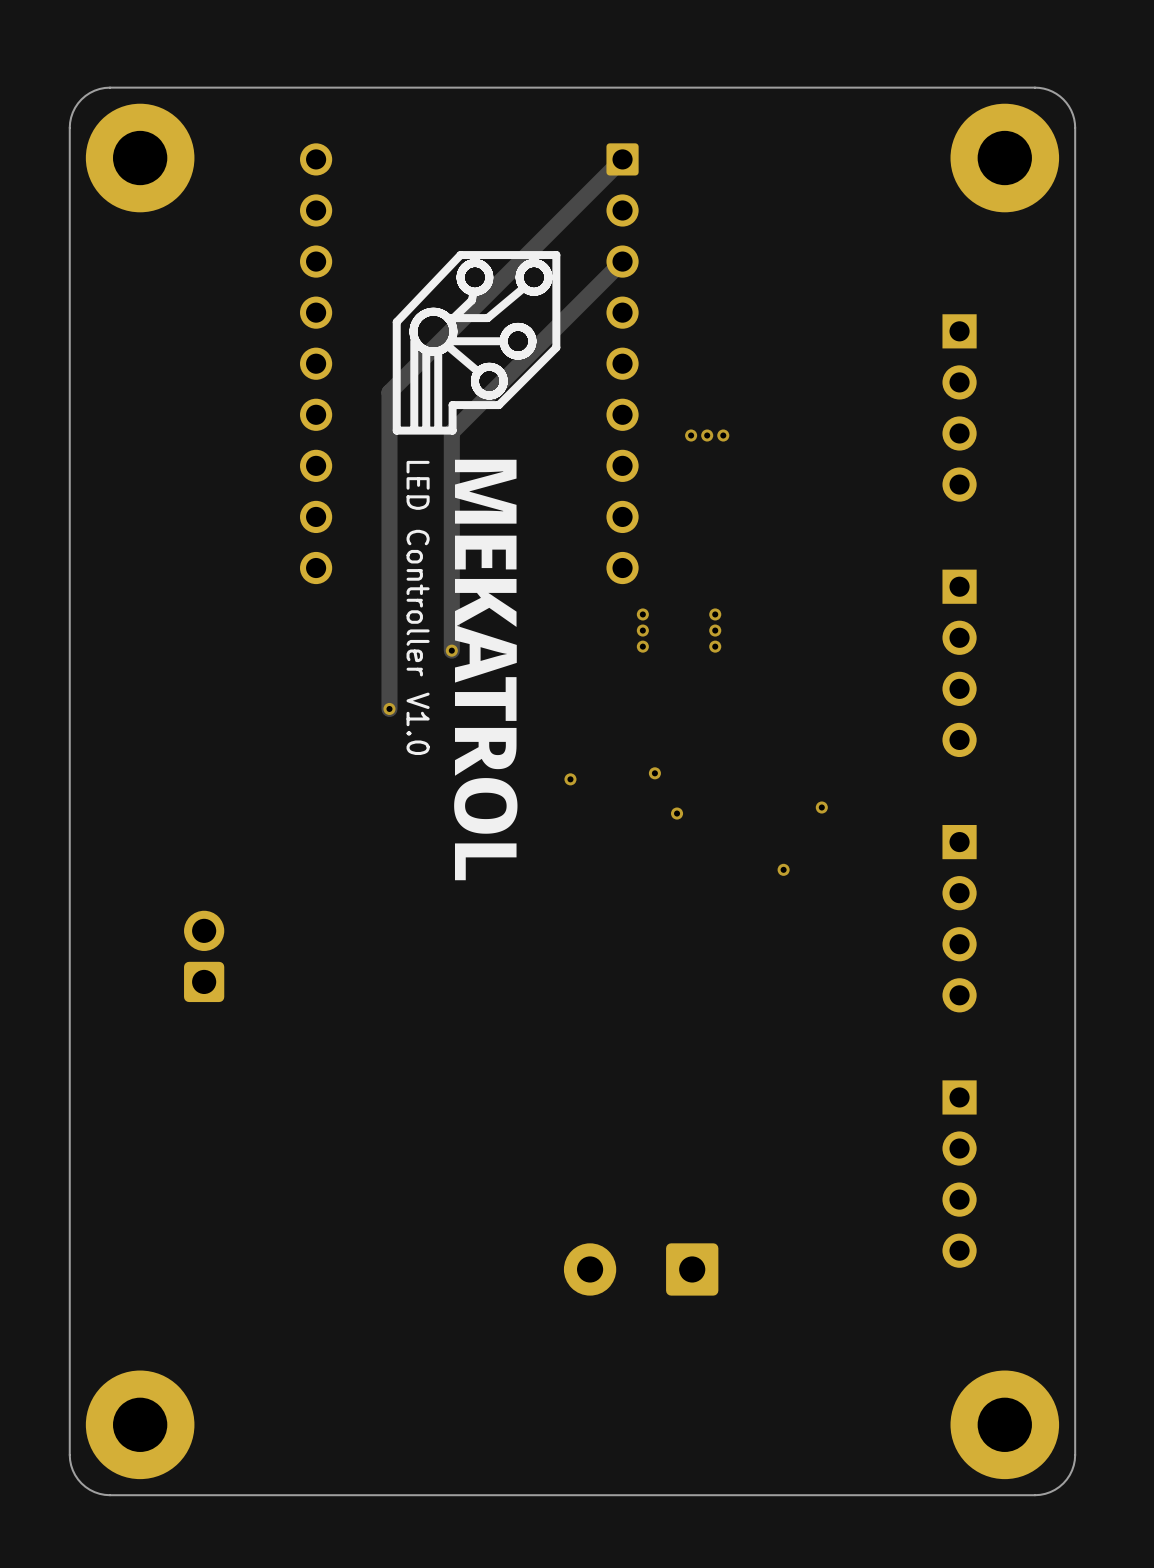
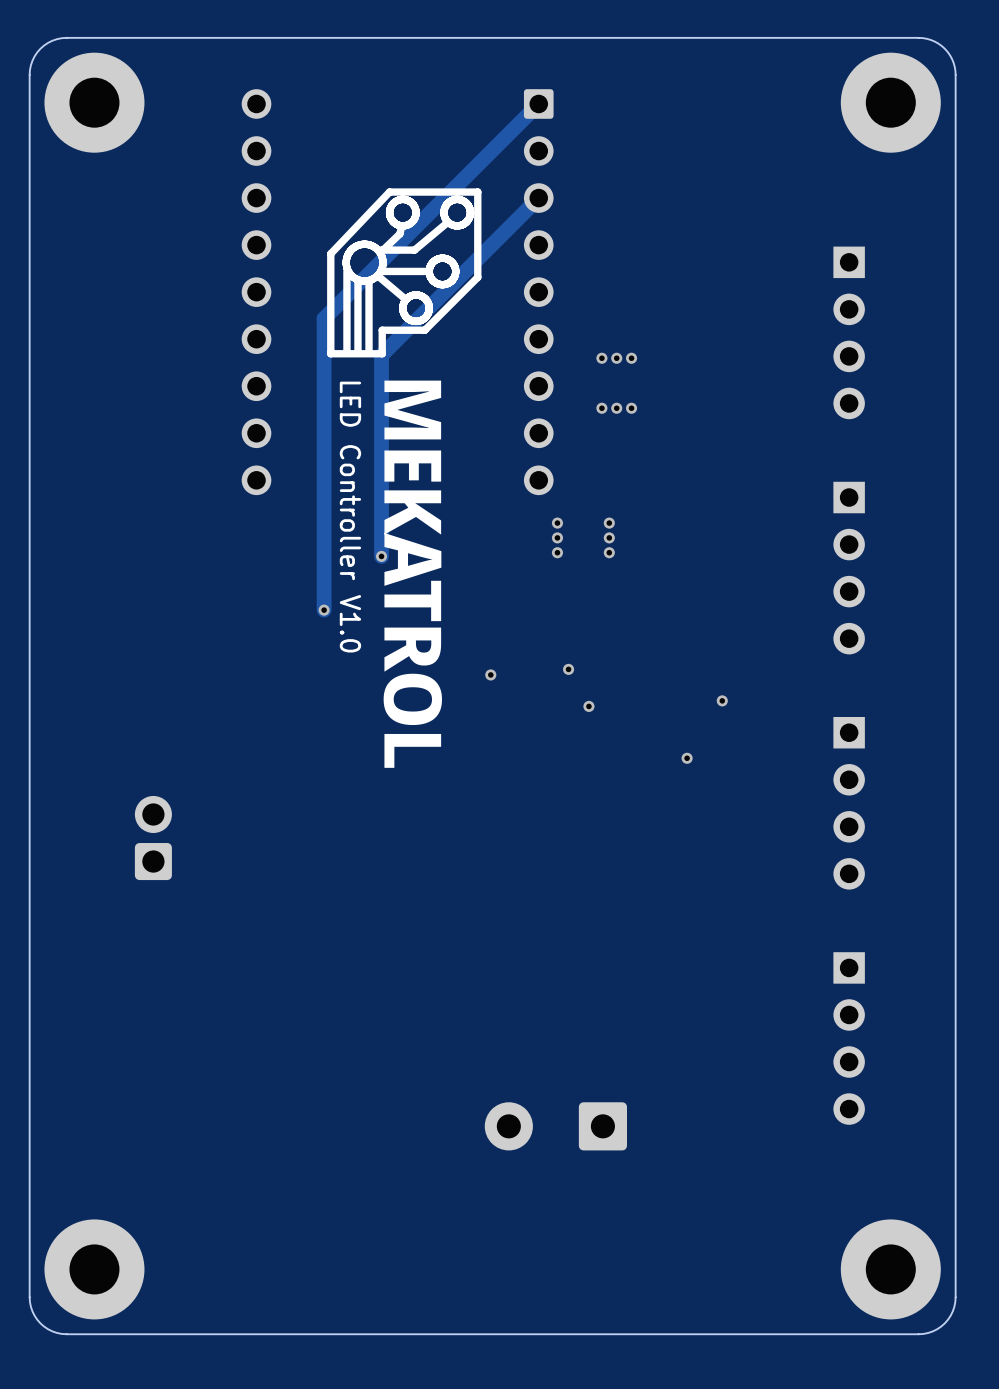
via: none -> (601, 408)
via: none -> (616, 408)
via: none -> (631, 408)
via: none -> (609, 523)
via: (715, 614) -> none
via: none -> (609, 537)
via: (715, 630) -> none
via: none -> (609, 552)
via: (715, 646) -> none

